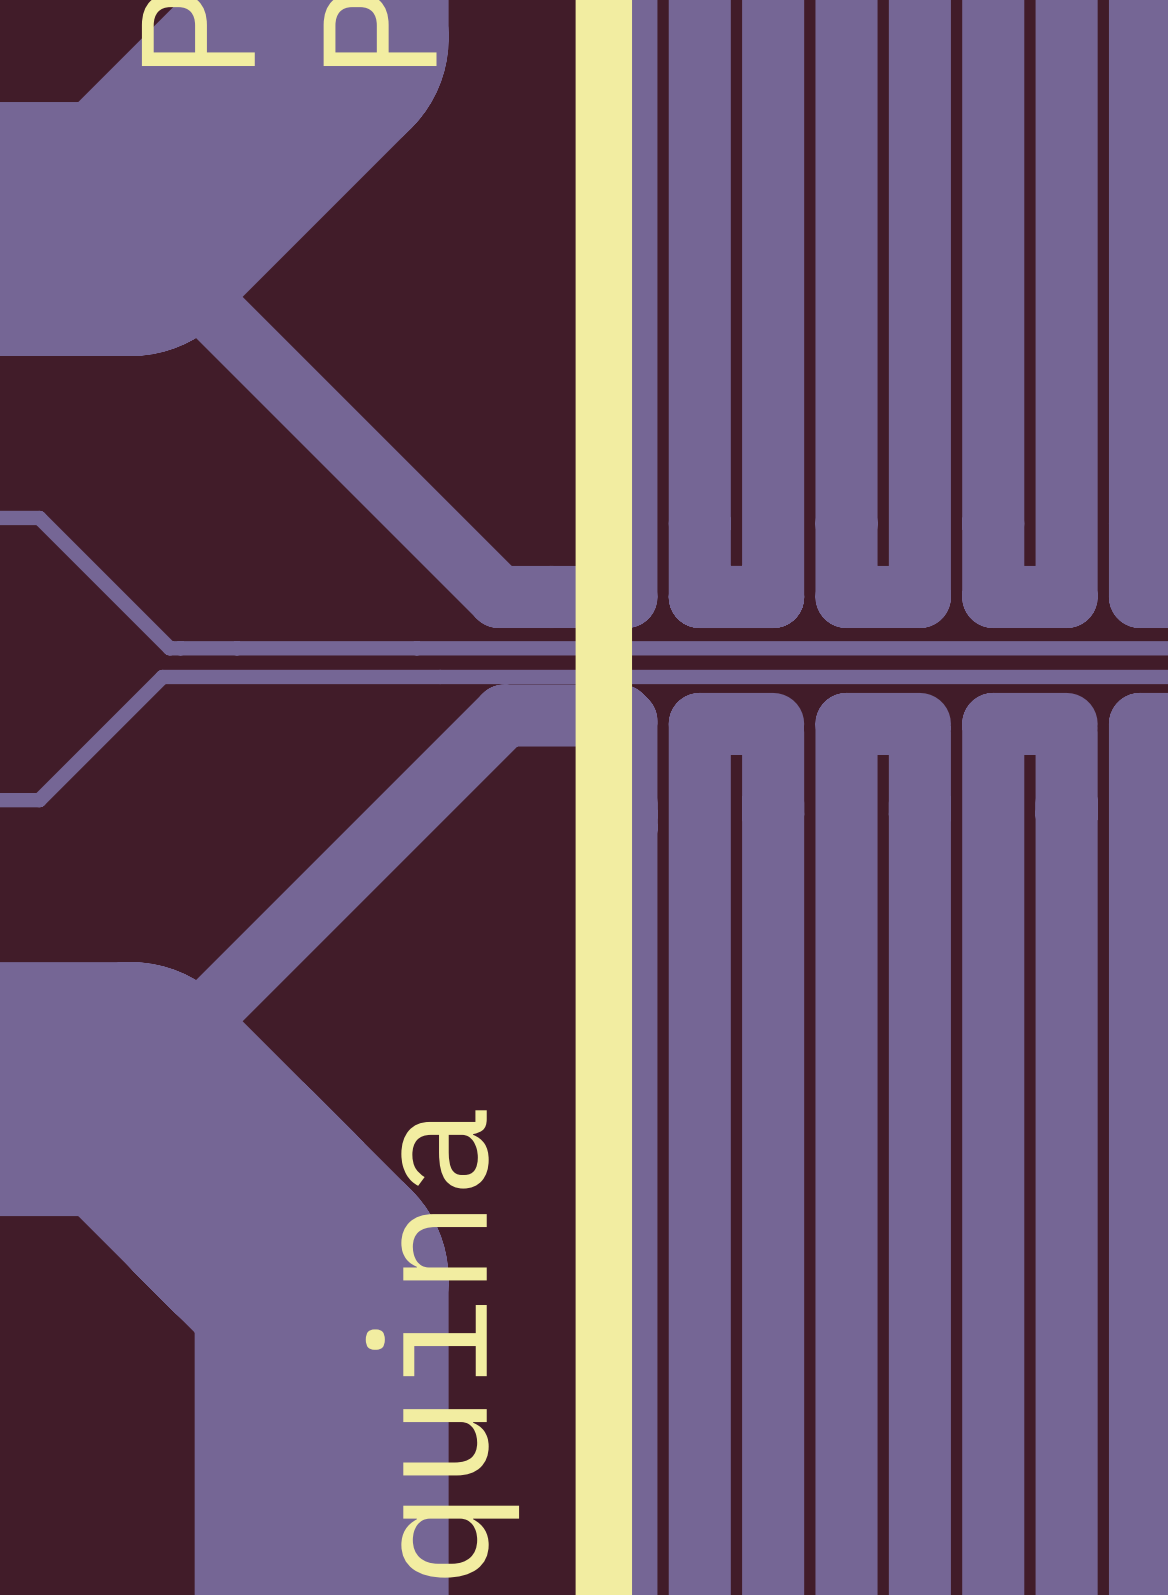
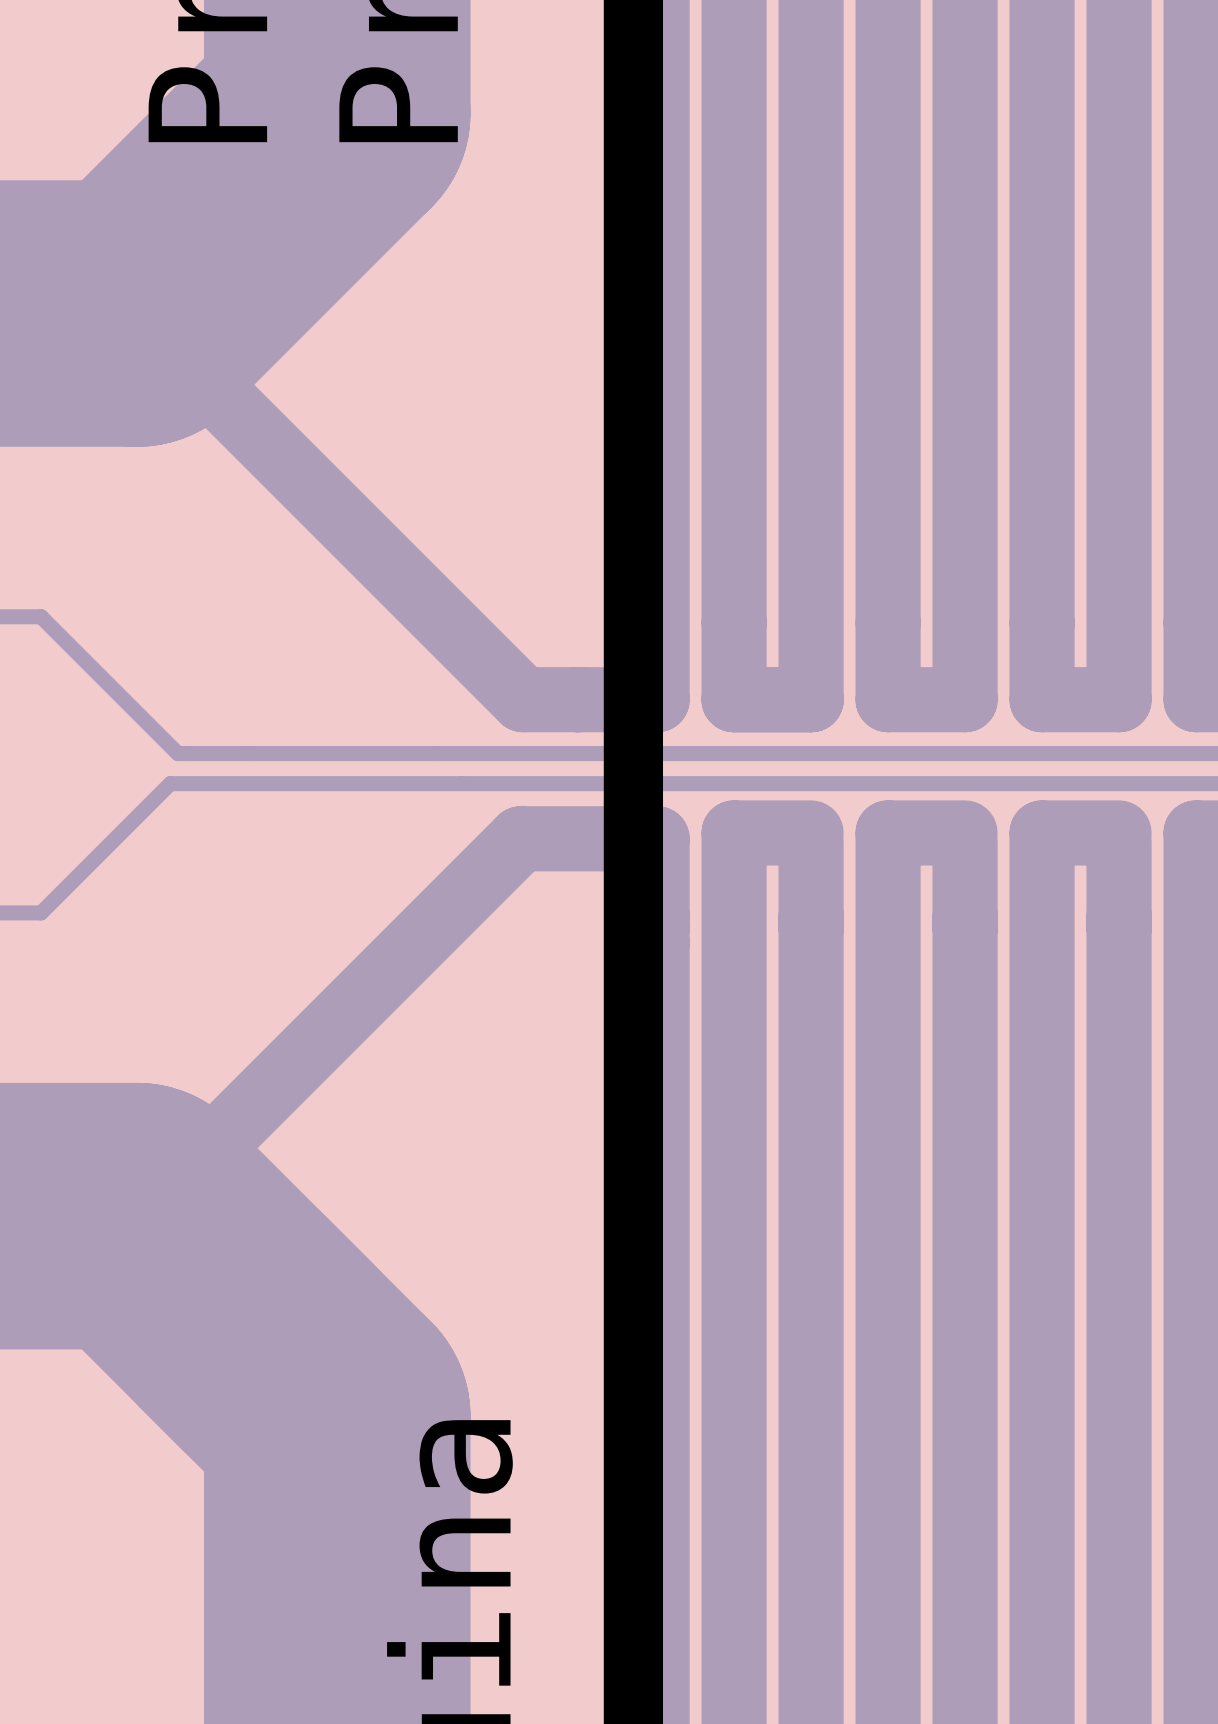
bottom track: (626, 729) (626, 721) (620, 715) (504, 715) (130, 1089) -> (657, 838) (520, 838) (143, 1216) (137, 1216)

